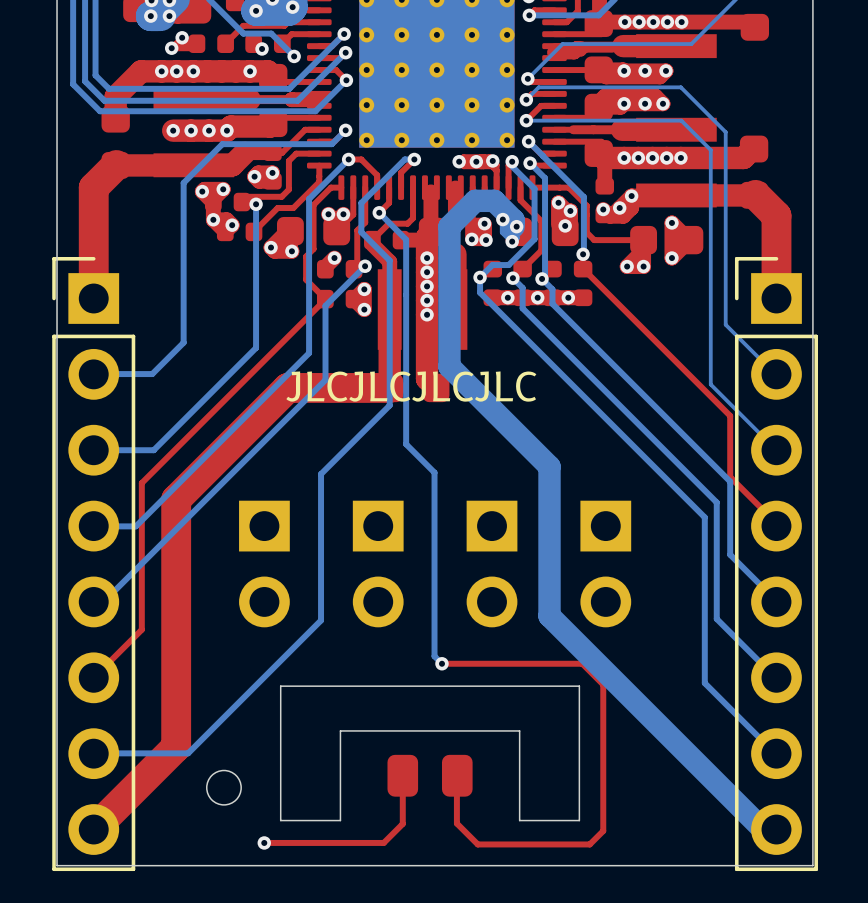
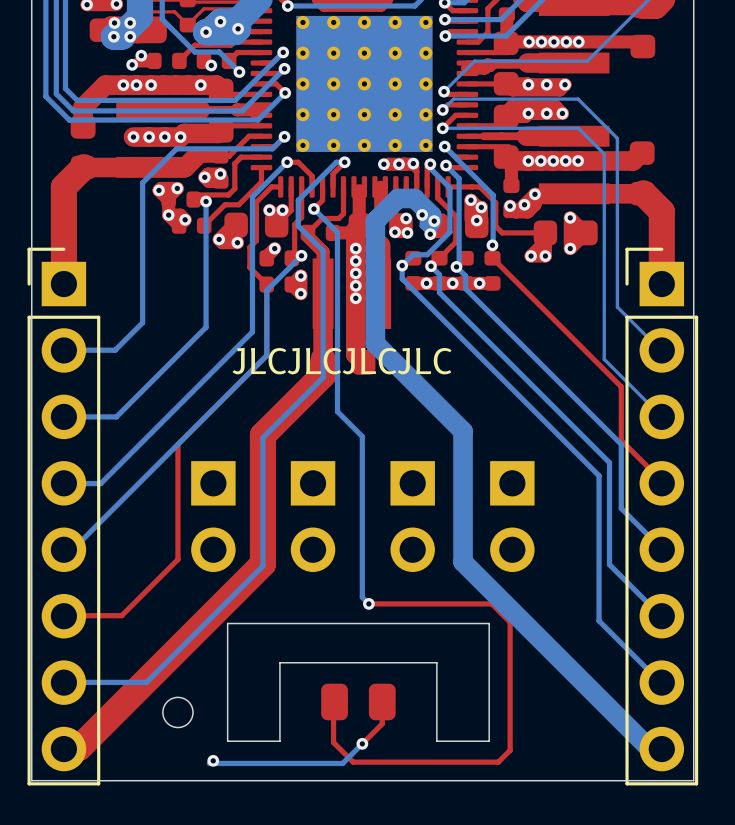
top track: (325, 299) (141, 483) (141, 629) (93, 677) -> (266, 289) (266, 355) (177, 444) (177, 559) (121, 615) (64, 615)
top track: (389, 387) (287, 387) (176, 499) (176, 747) (93, 829) -> (323, 362) (323, 375) (262, 435) (262, 564) (79, 747) (61, 747)
top track: (402, 775) (402, 823) (383, 842) (264, 842) -> none
top track: (456, 775) (456, 823) (477, 844) -> (382, 701) (382, 723) (362, 743)
top track: none -> (333, 703) (333, 742) (353, 762) (400, 762)
bottom track: none -> (362, 743) (342, 763) (209, 763)
via: none -> (362, 743)

